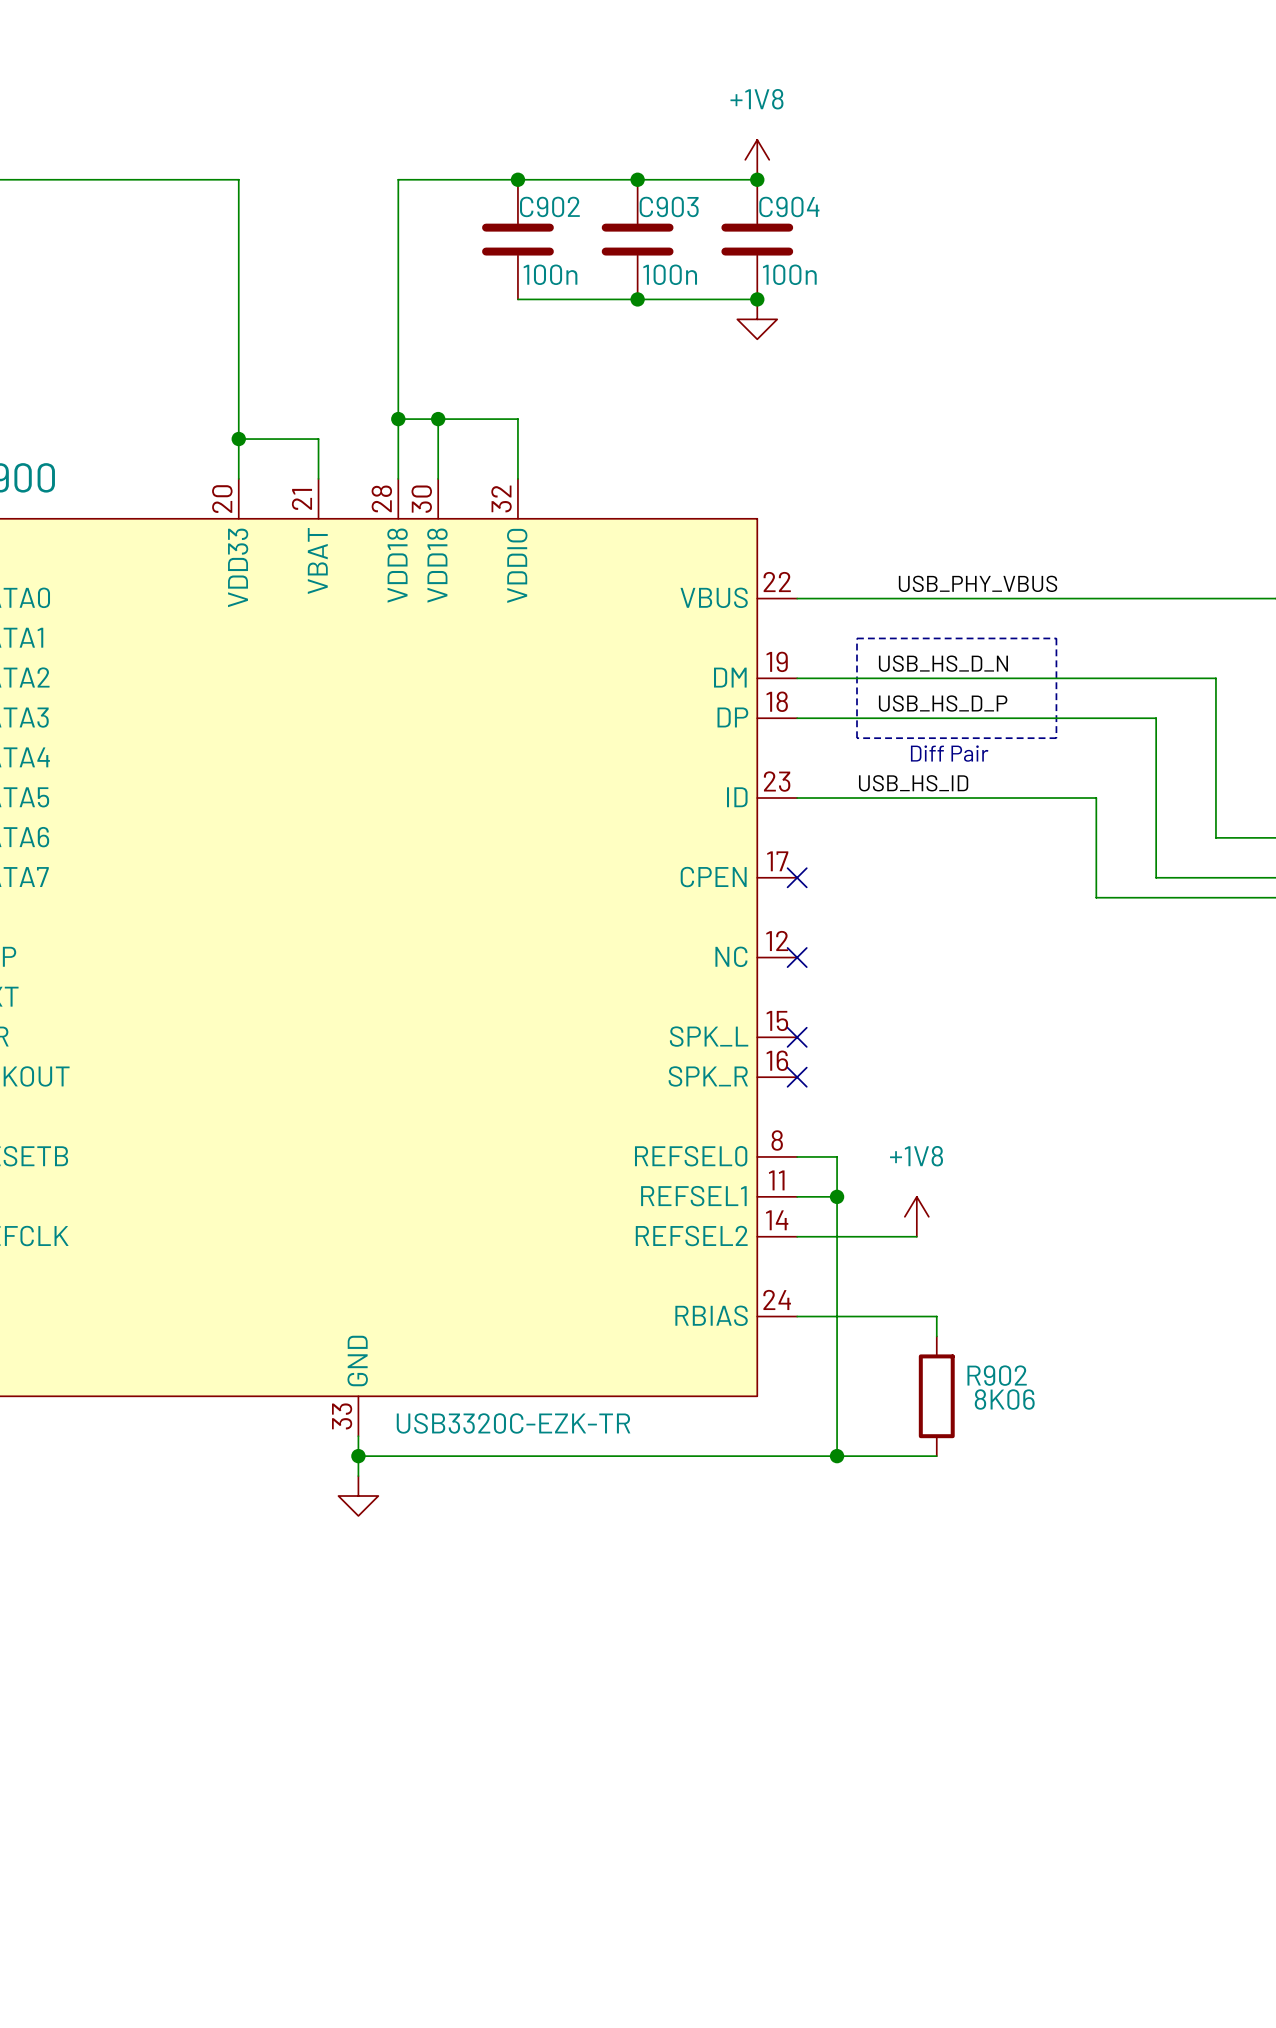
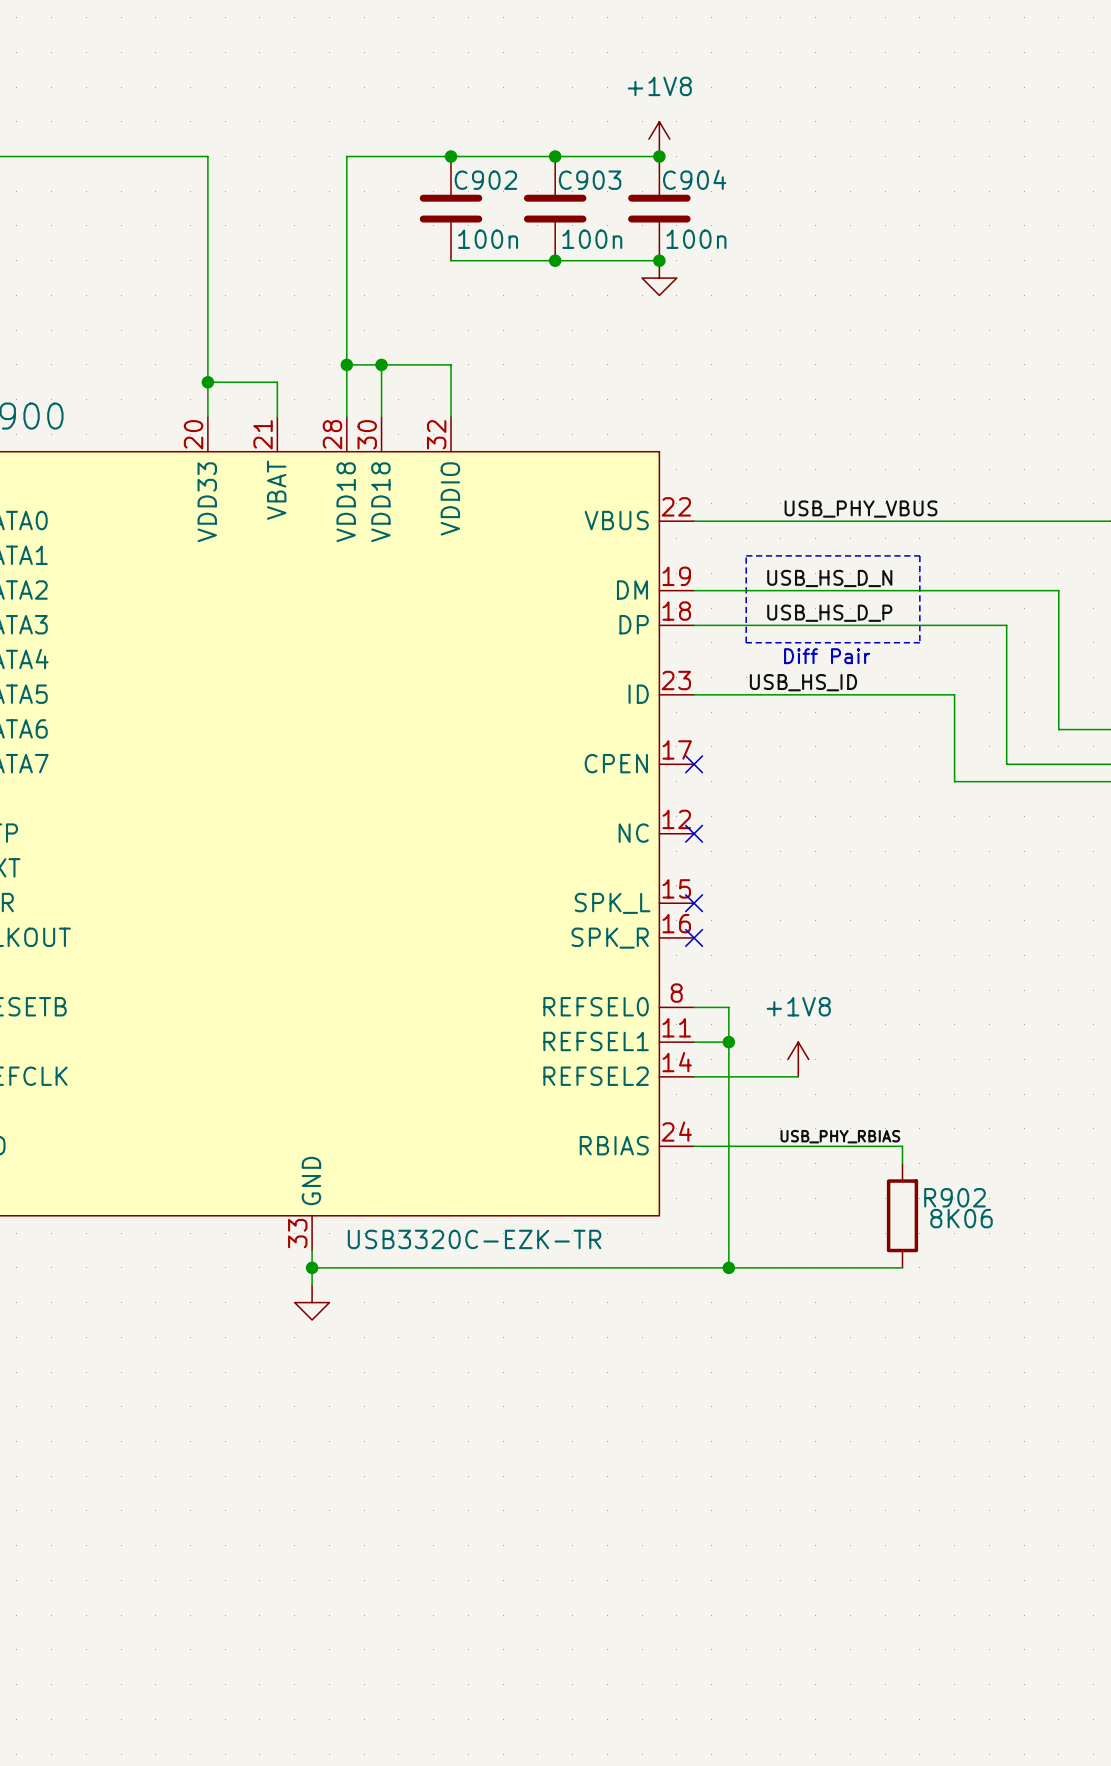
label: none -> USB_PHY_RBIAS (840, 1136)
wire: (936, 1316) (936, 1336) -> (815, 1146) (902, 1146) (902, 1163)
R902 position: (936, 1396) -> (902, 1215)
wire: none -> (815, 1267) (902, 1267)

